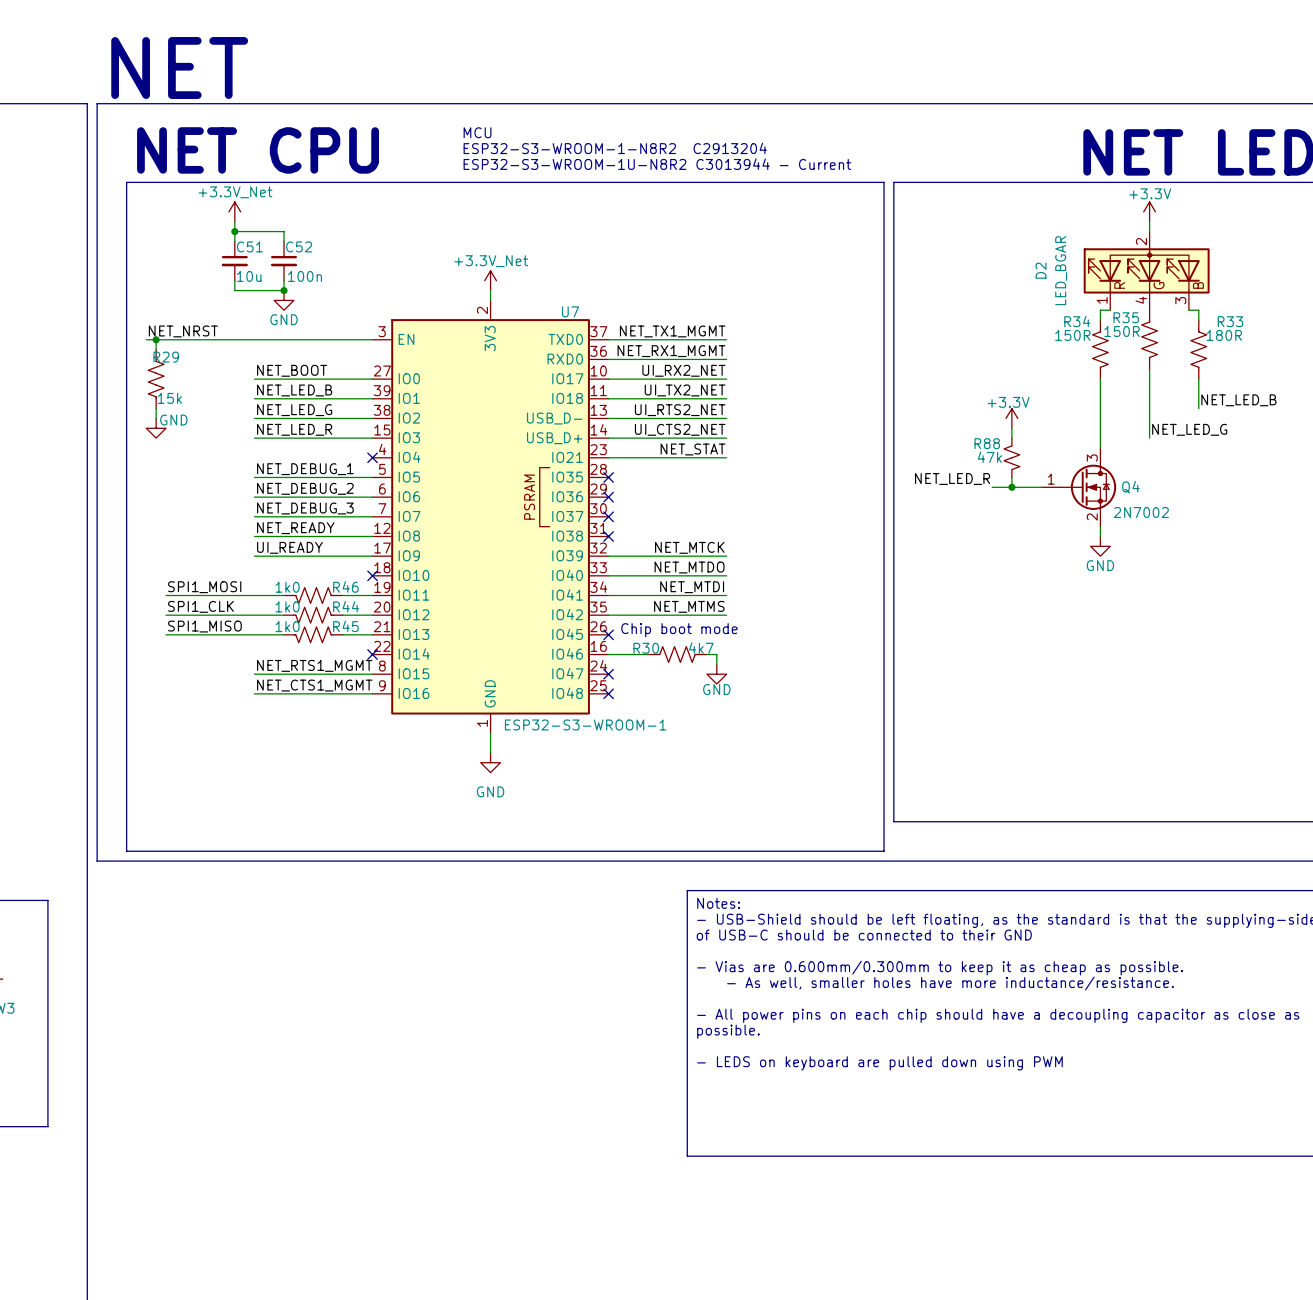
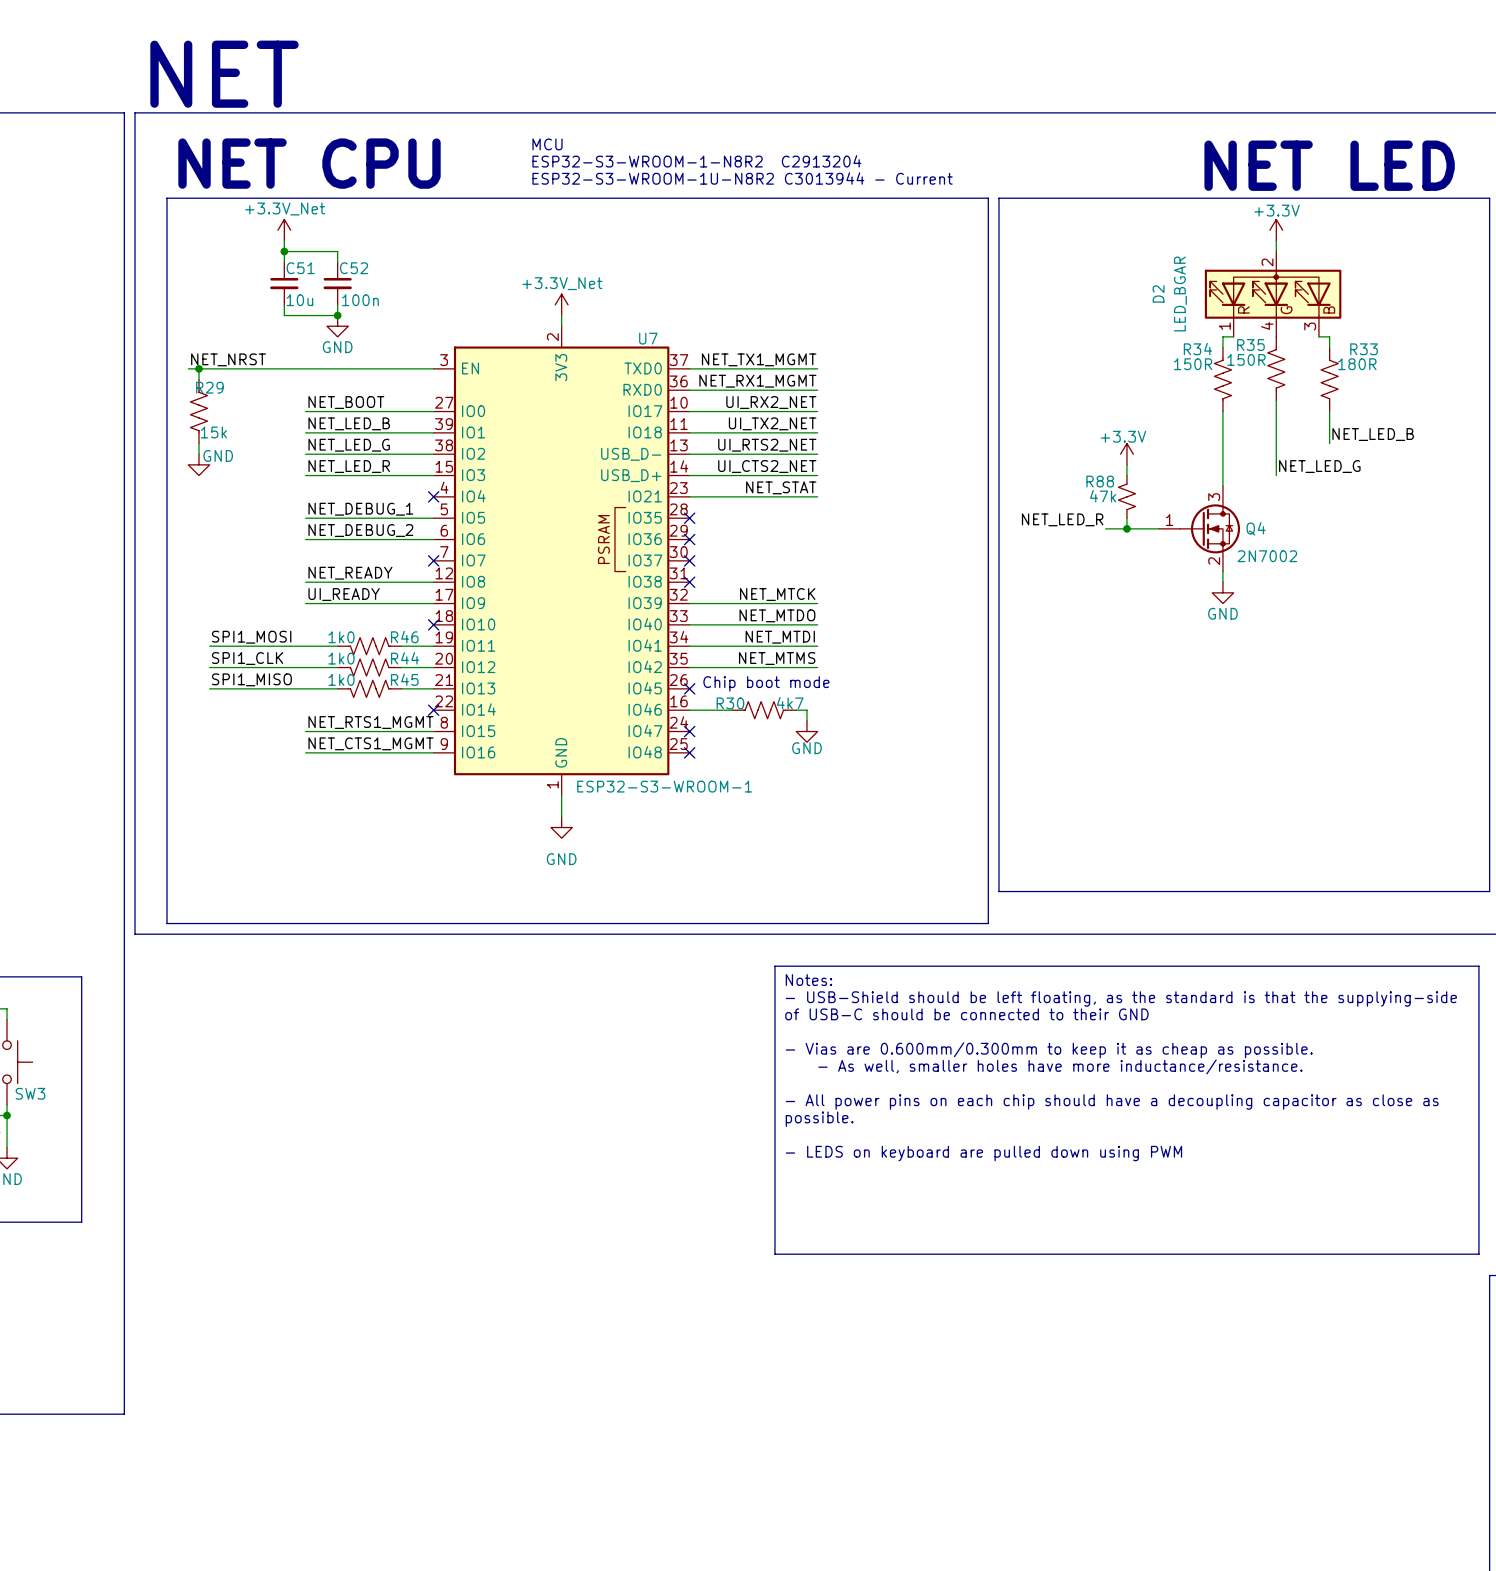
label: NET_DEBUG_3 (305, 508) -> none
wire: (254, 516) (372, 516) -> none
no-connect mark: none -> (433, 560)

